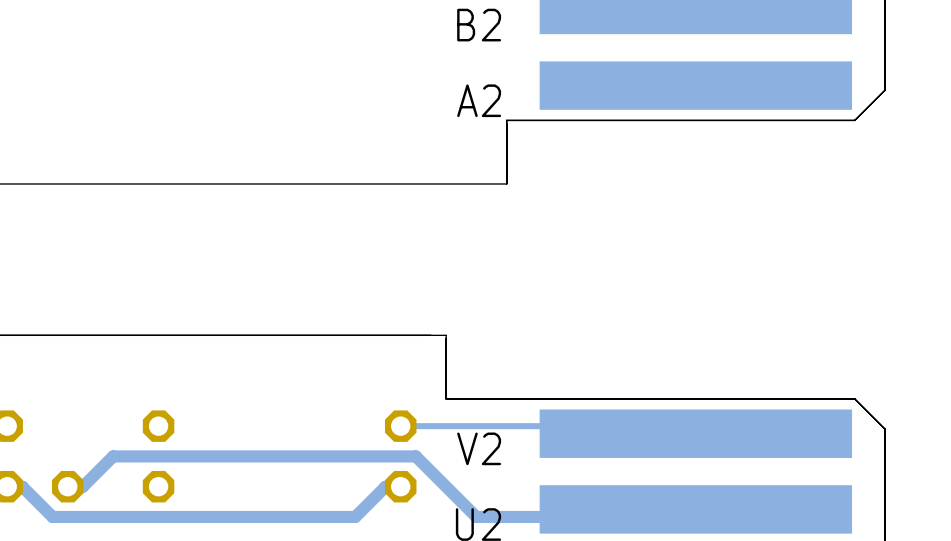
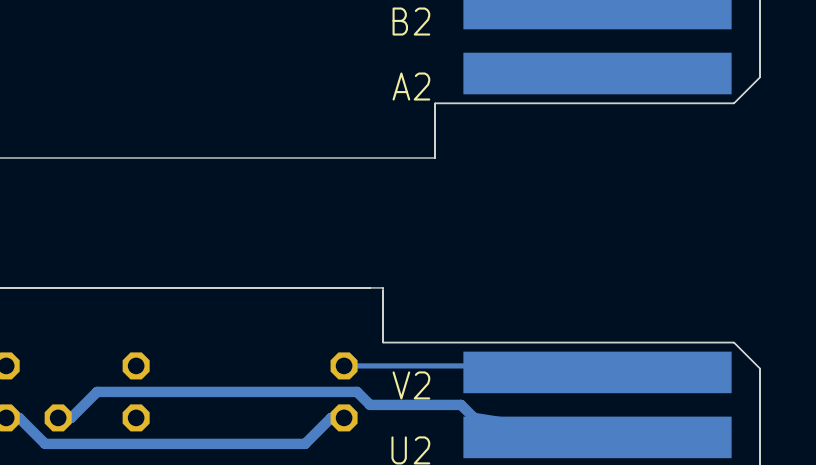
track: (430, 471) (476, 516) (582, 516) (695, 509) -> (370, 404) (461, 404) (474, 417) (597, 437)

